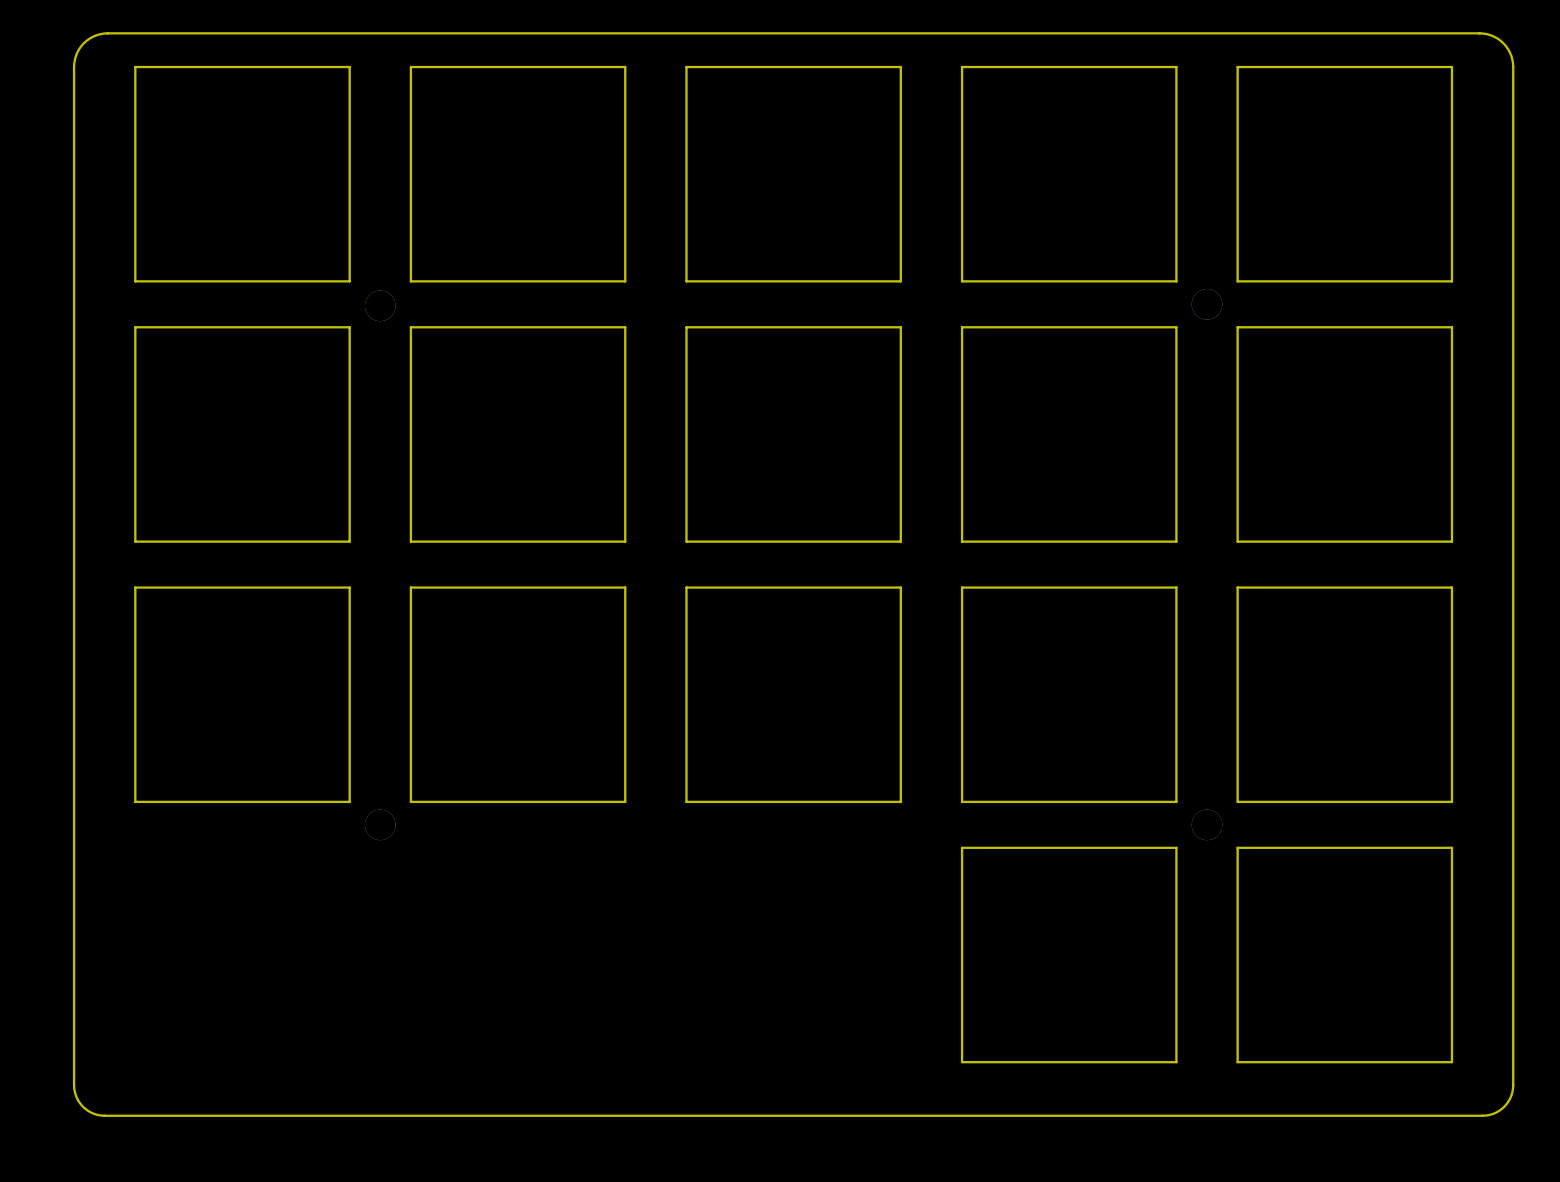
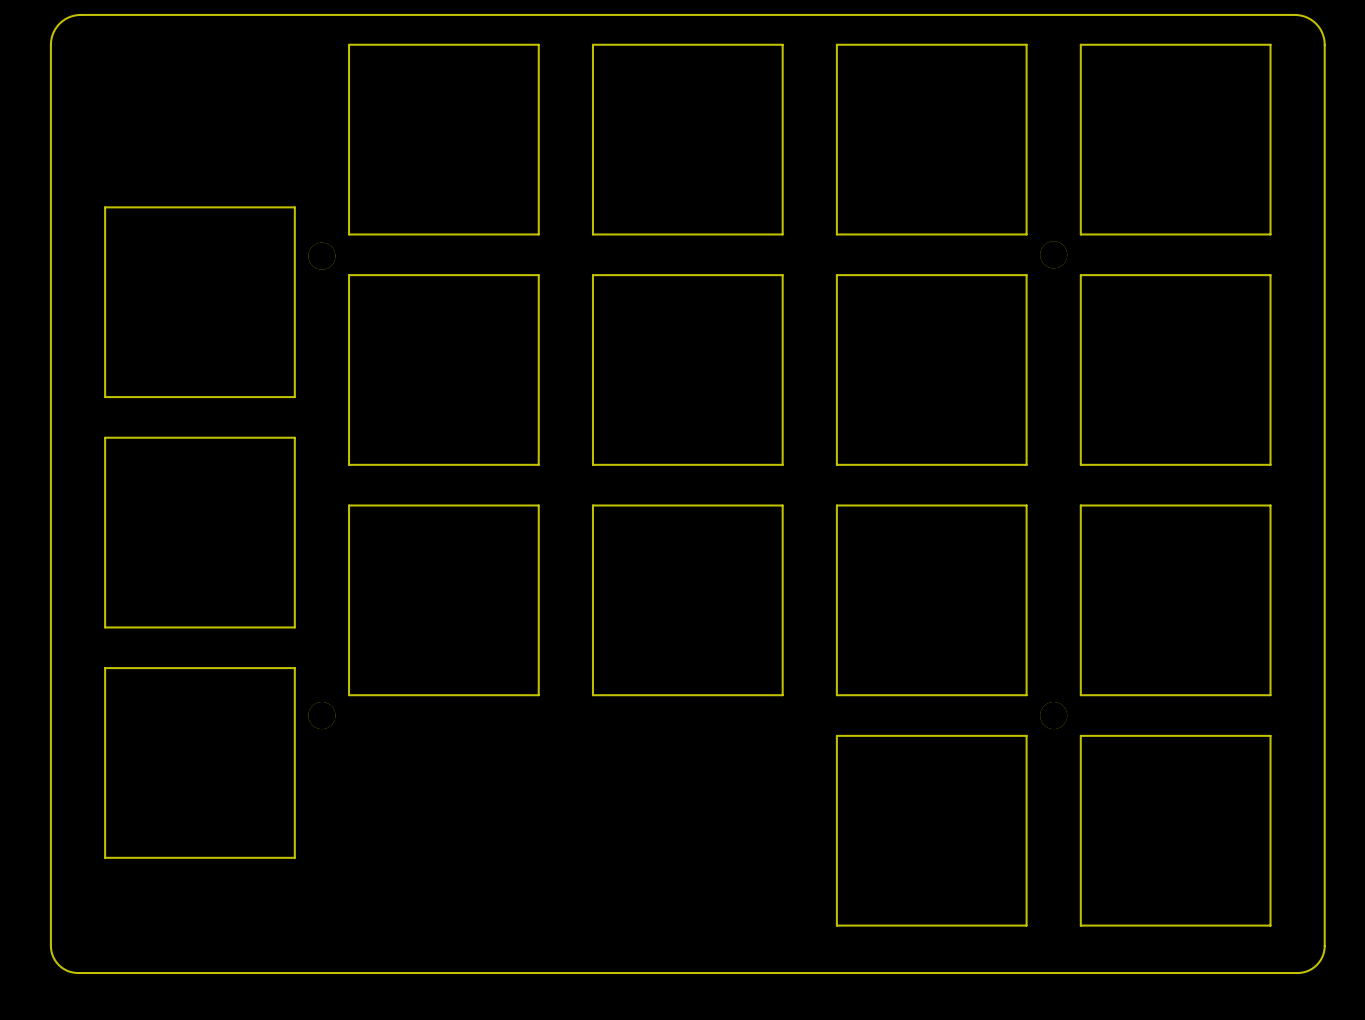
board edge: (135, 250) (135, 67) (349, 67) (349, 250) -> (105, 207) (294, 207)
board edge: (135, 281) (349, 281) -> (105, 234) (105, 275)
board edge: (135, 327) (349, 327) -> (294, 234) (294, 275)
board edge: (135, 465) (135, 511) -> (105, 397) (294, 397)
board edge: (349, 465) (349, 511) -> (105, 437) (294, 437)
board edge: (135, 541) (349, 541) -> (105, 464) (105, 505)
board edge: (135, 587) (349, 587) -> (294, 464) (294, 505)
board edge: (135, 725) (135, 771) -> (105, 627) (294, 627)
board edge: (349, 725) (349, 771) -> (105, 668) (294, 668)
board edge: (135, 801) (349, 801) -> (105, 695) (105, 857) (294, 857) (294, 695)

